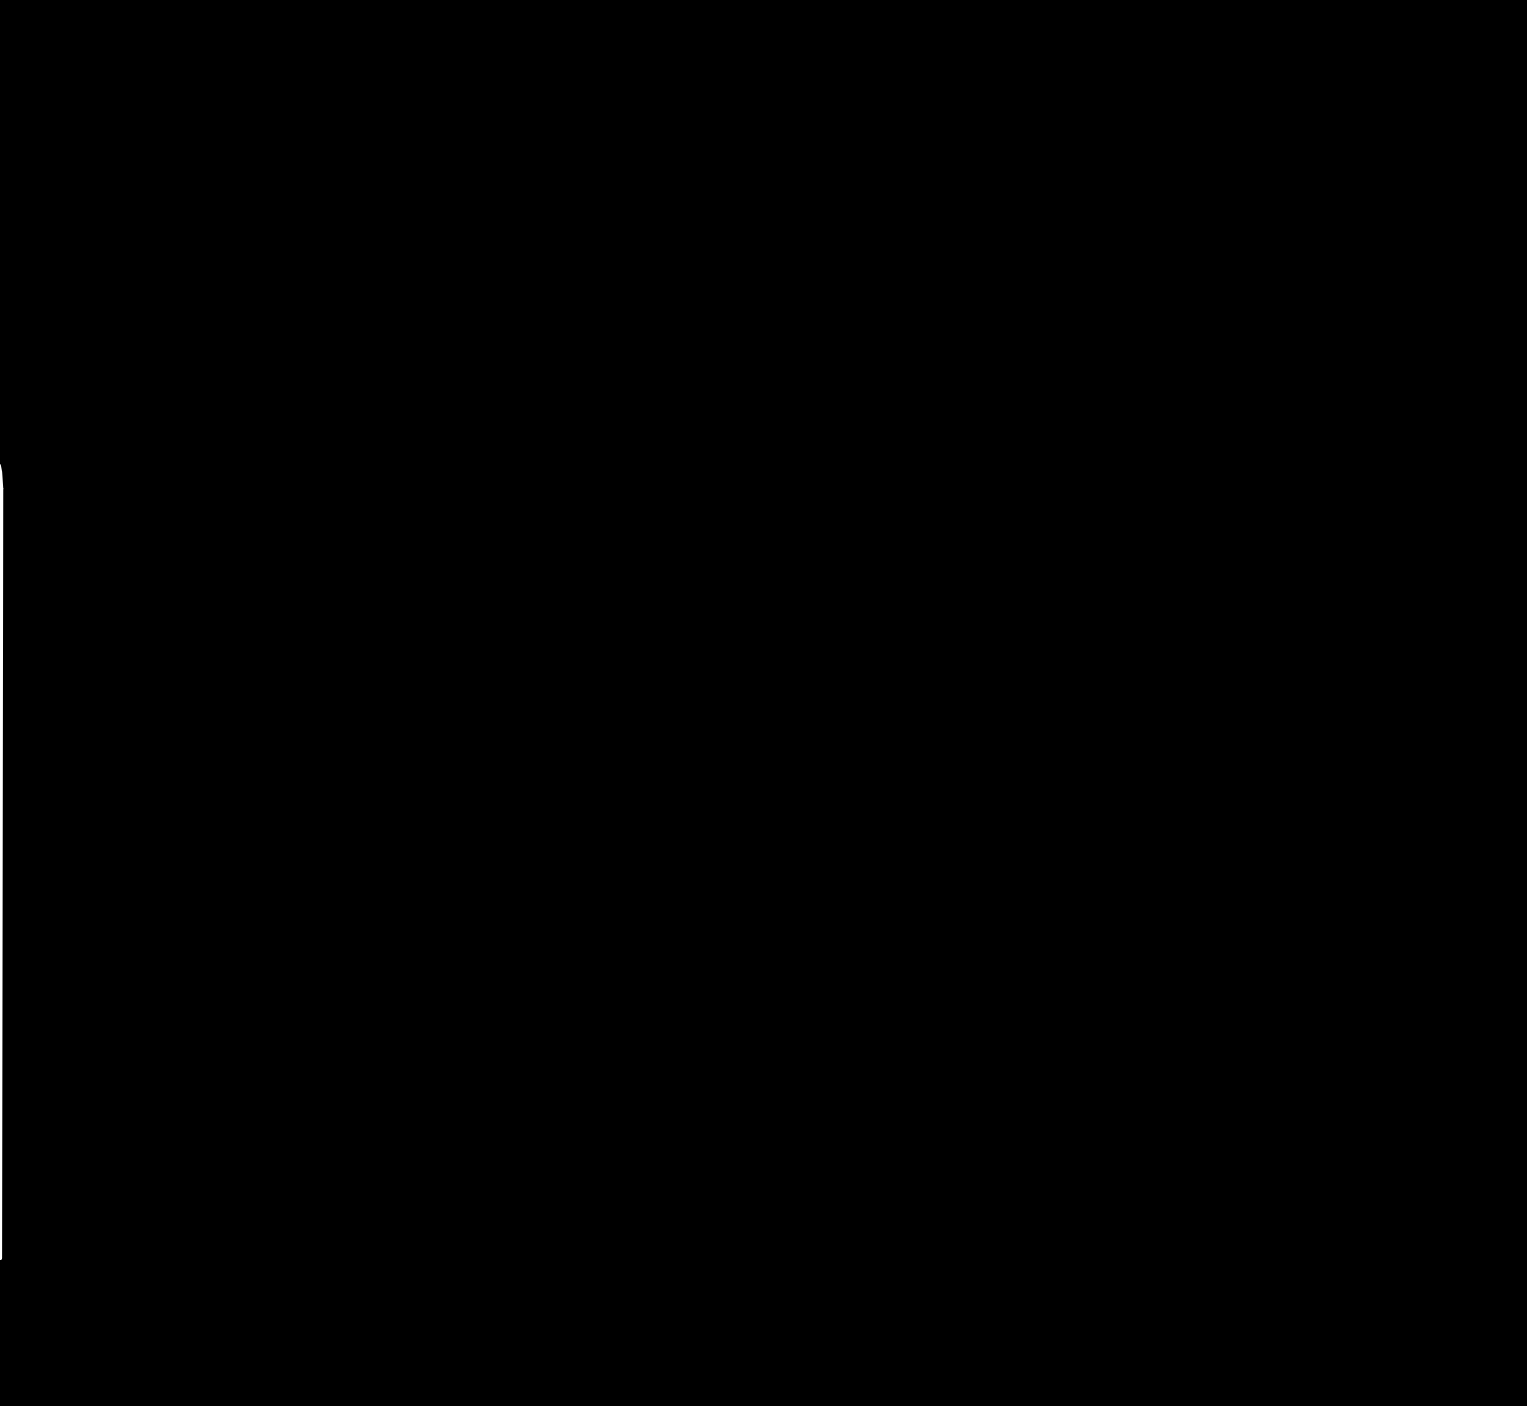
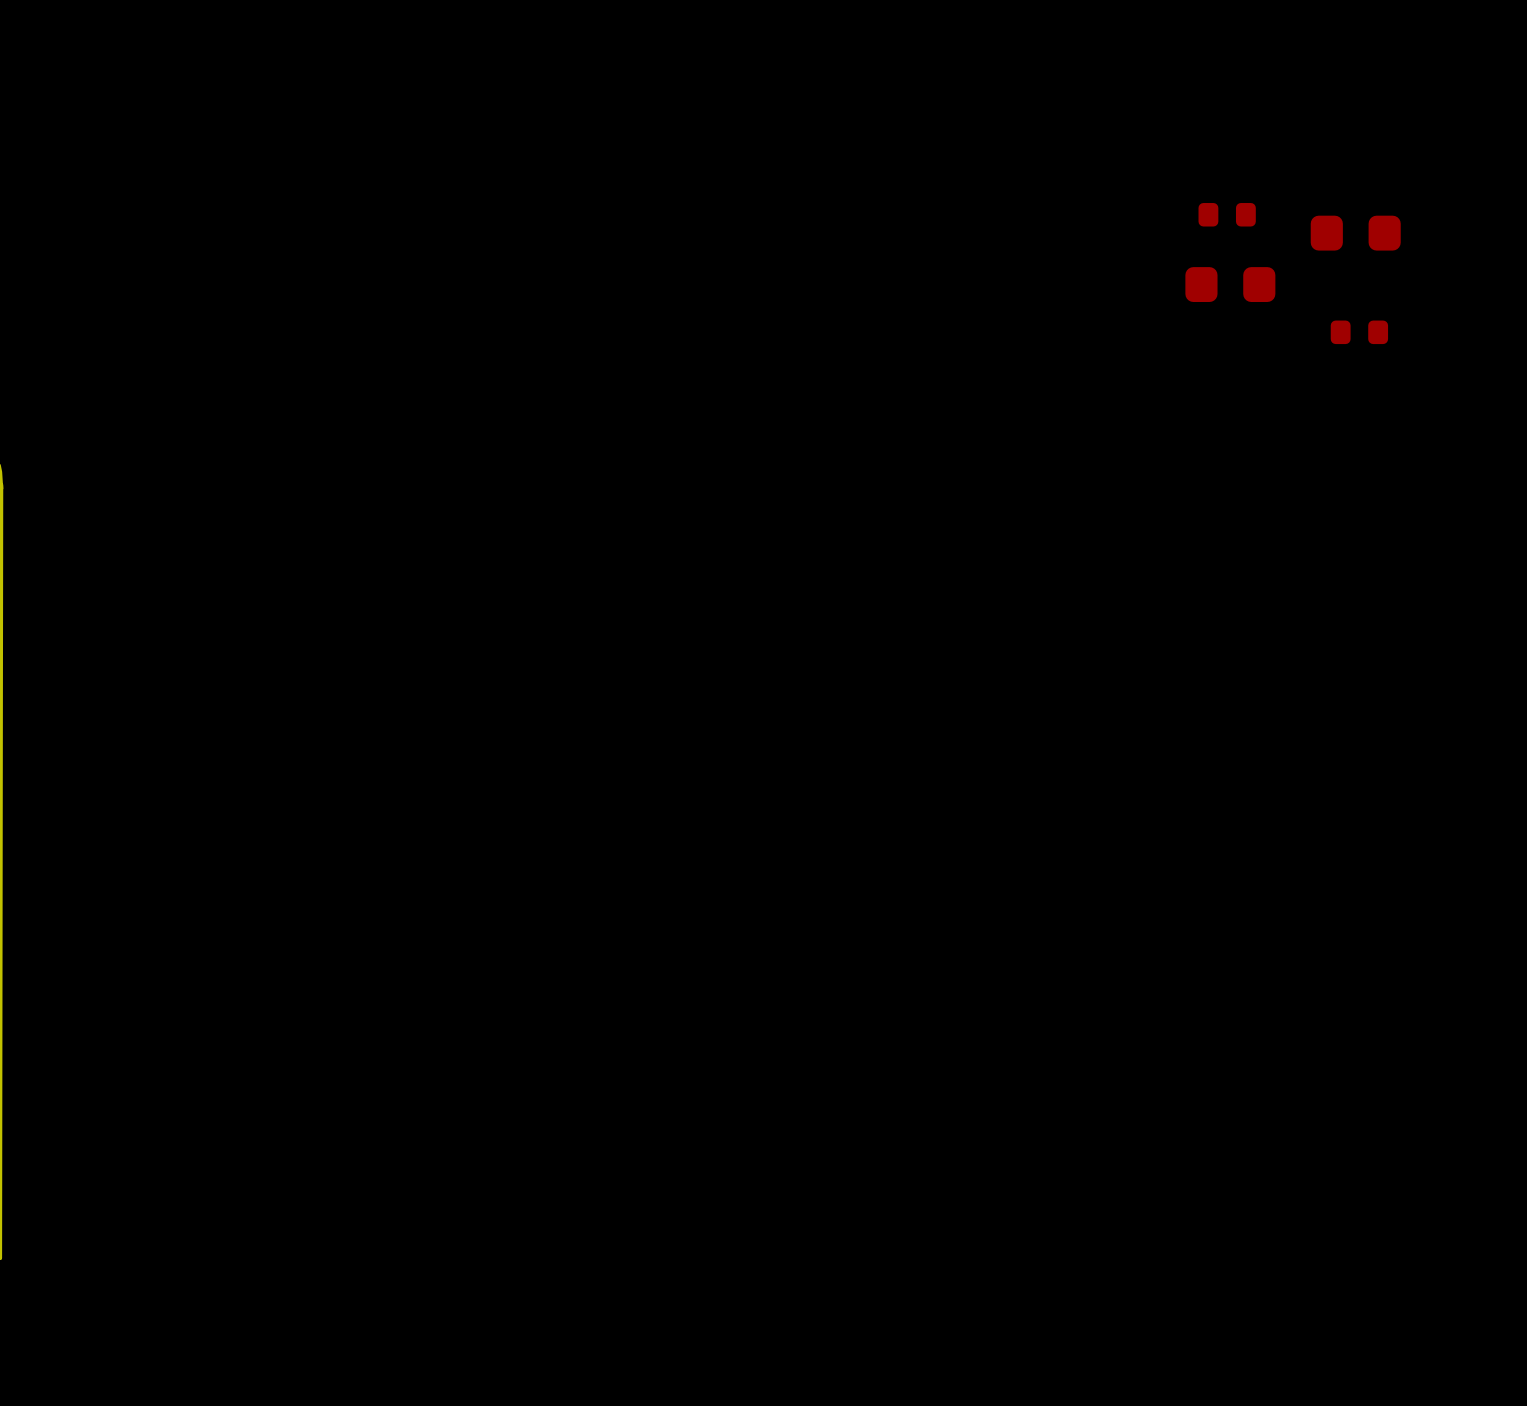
part: none -> (1227, 214)
part: none -> (1355, 233)
part: none -> (1230, 284)
part: none -> (1359, 332)

